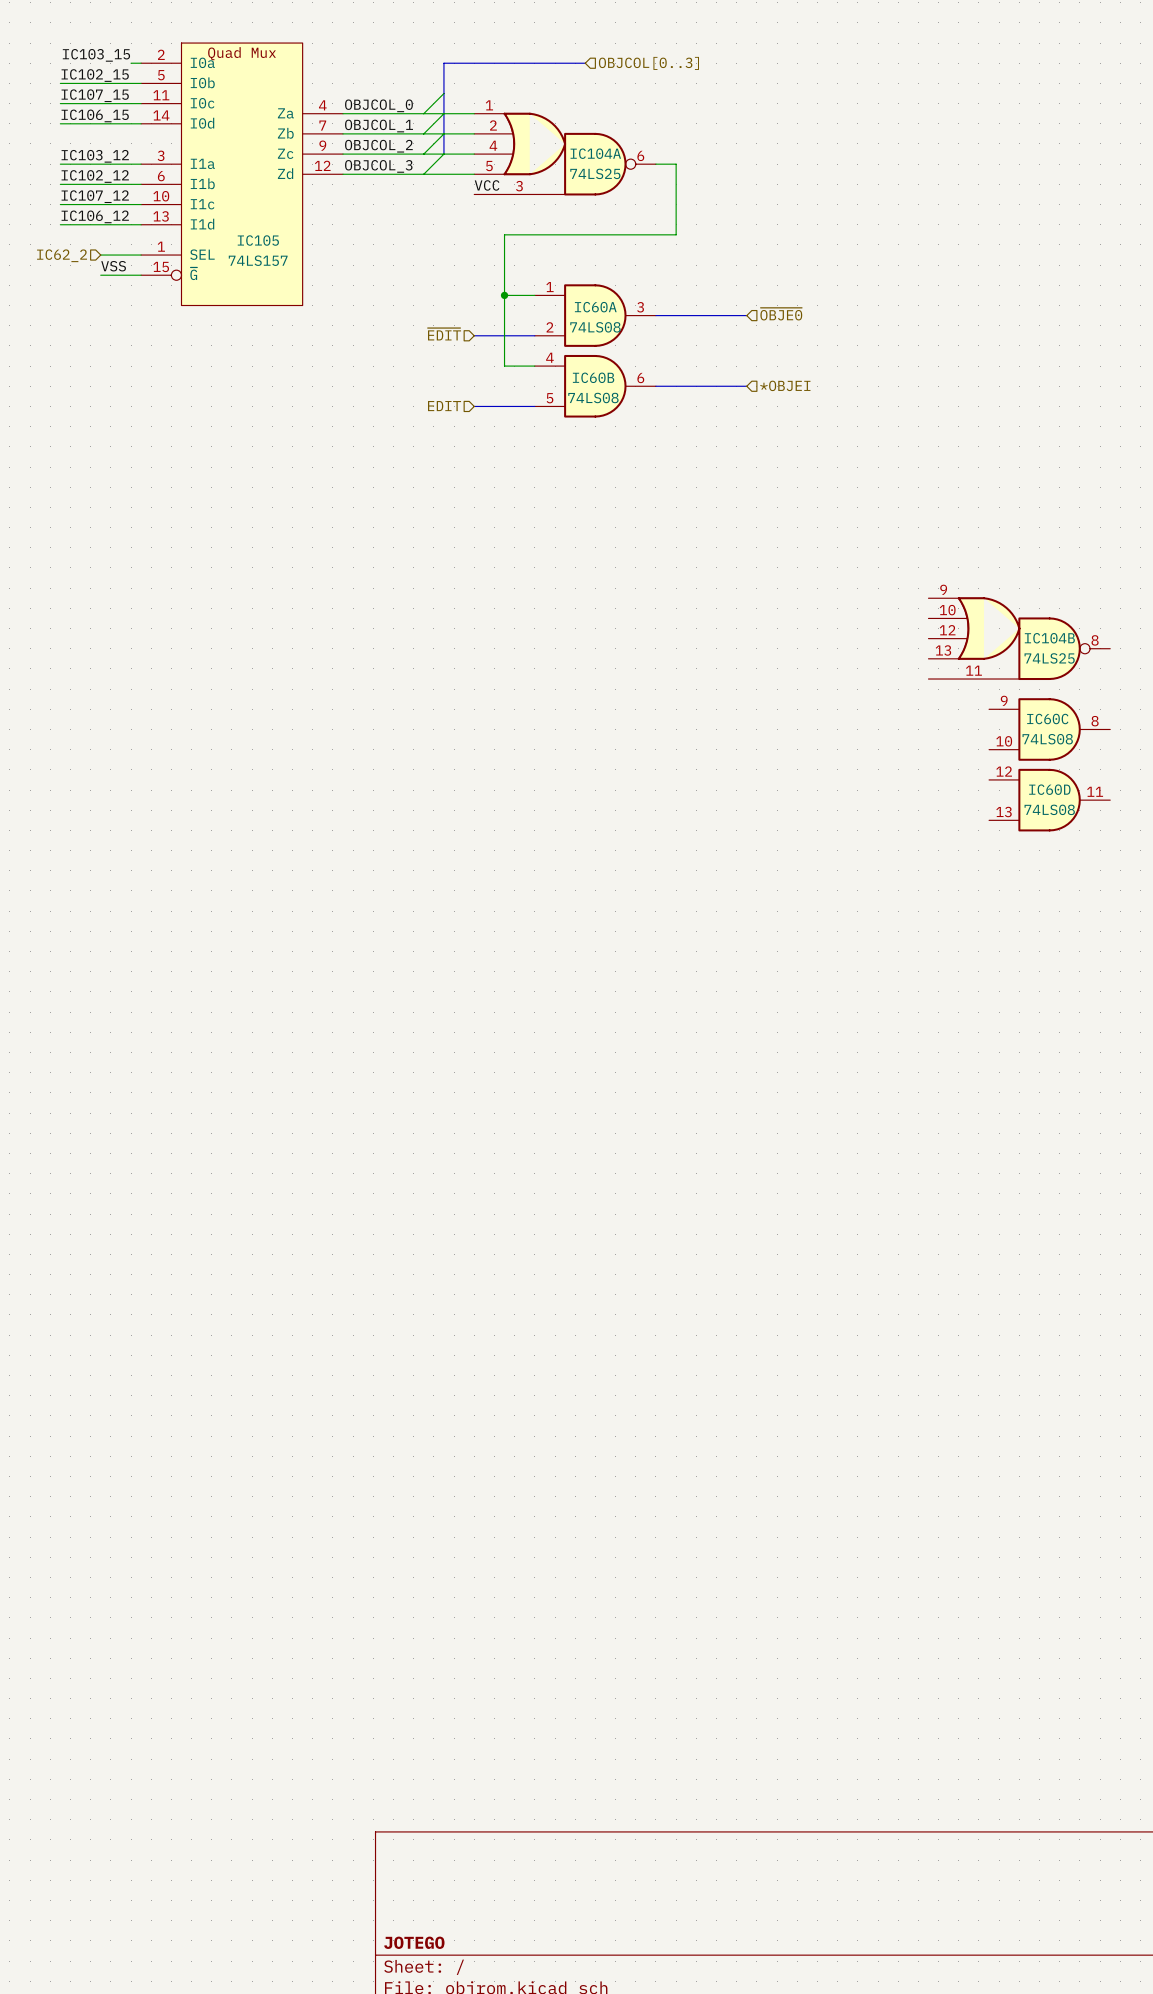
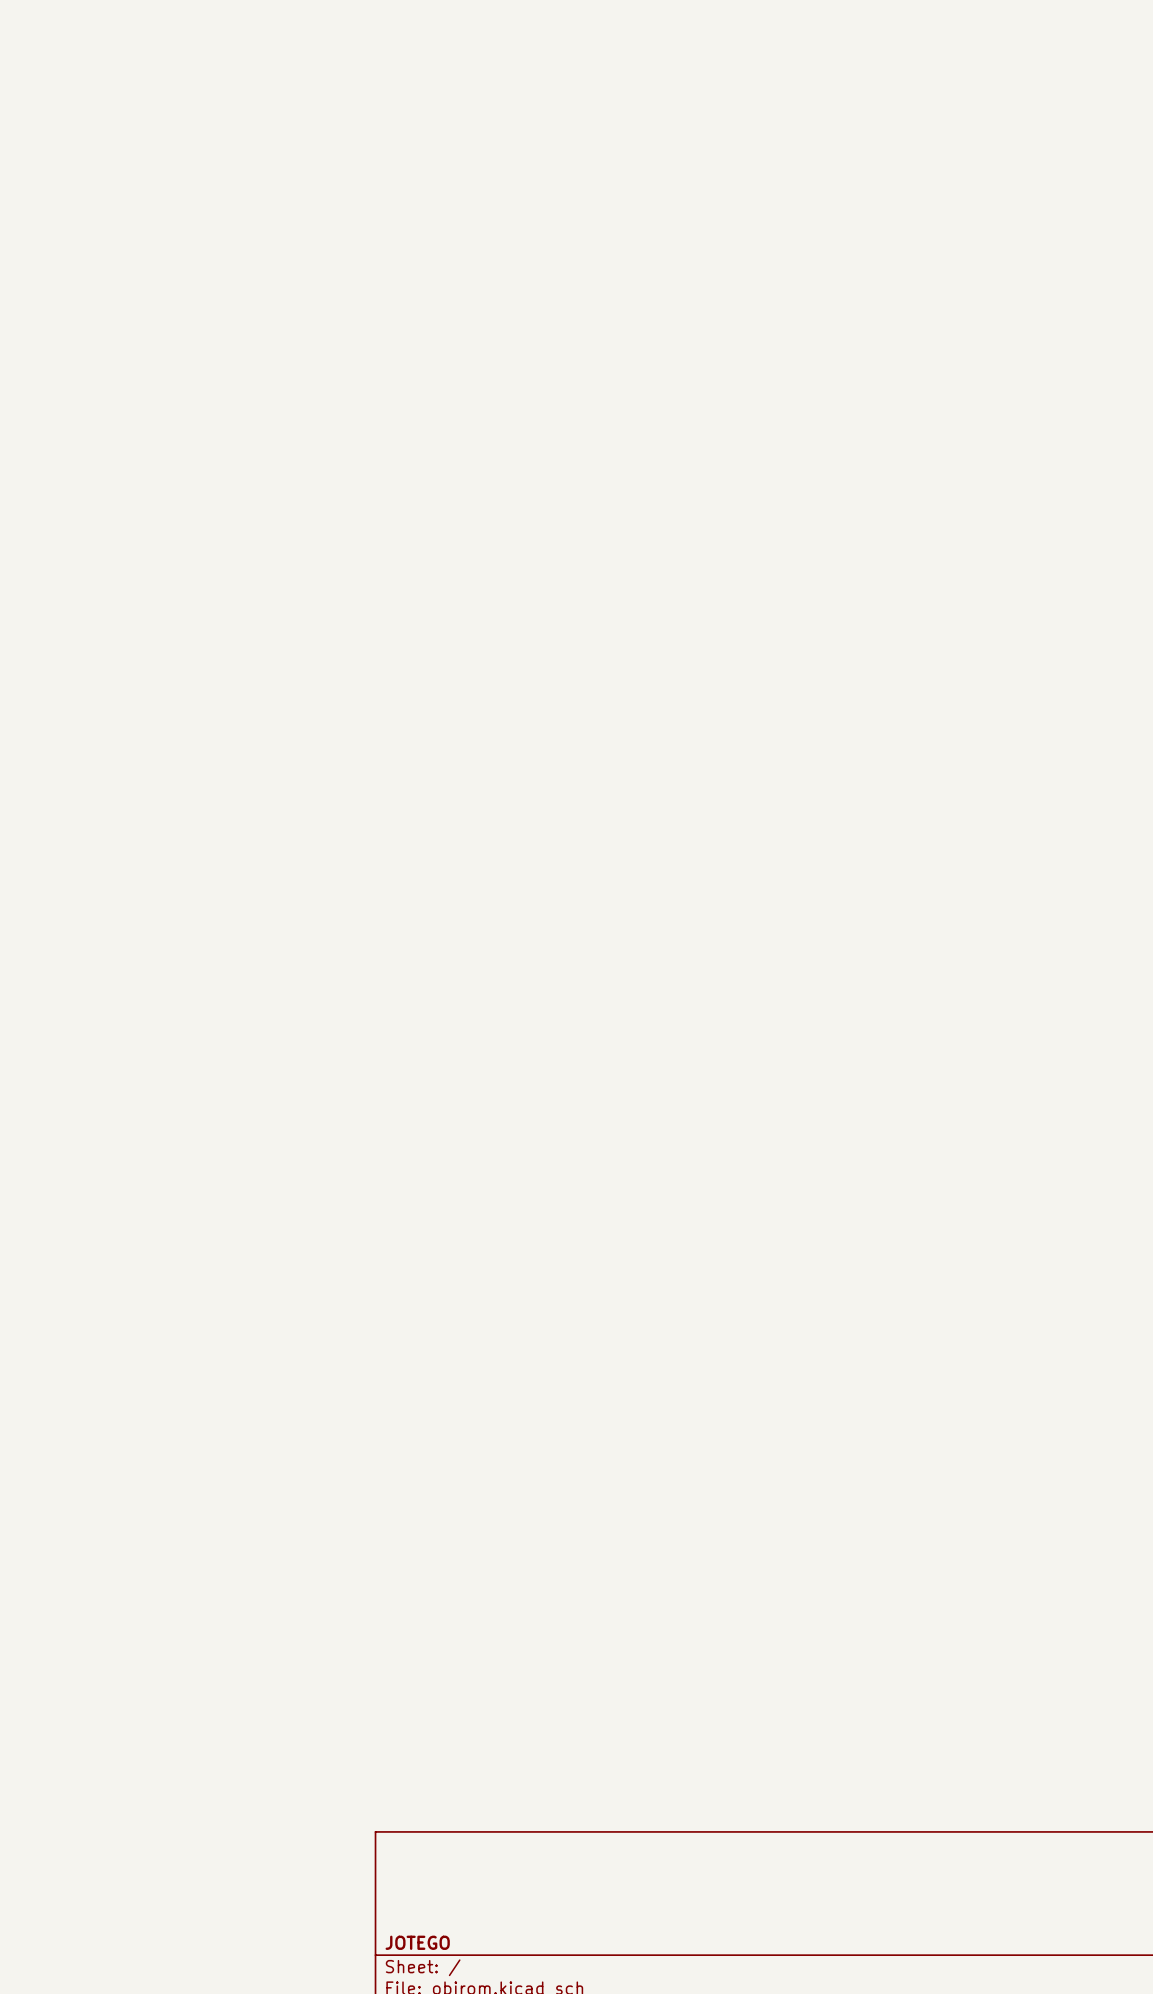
label: IC103_15 (96, 55) -> none
wire: (131, 63) (141, 63) -> none
bus: (585, 63) (443, 63) (443, 154) -> none
hierarchical label: OBJCOL[0..3] (648, 63) -> none
label: IC102_15 (95, 75) -> none
wire: (60, 83) (141, 83) -> none
wire: (443, 93) (423, 113) -> none
label: IC107_15 (95, 95) -> none
wire: (60, 103) (141, 103) -> none
label: OBJCOL_0 (378, 105) -> none
wire: (343, 113) (474, 113) -> none
wire: (443, 113) (423, 133) -> none
label: IC106_15 (95, 115) -> none
wire: (60, 123) (141, 123) -> none
label: OBJCOL_1 (379, 126) -> none
wire: (343, 133) (474, 133) -> none
wire: (443, 133) (423, 154) -> none
label: OBJCOL_2 (378, 146) -> none
wire: (343, 154) (474, 154) -> none
wire: (443, 154) (423, 174) -> none
IC104A: 74LS25 (565, 154) -> none
label: IC103_12 (95, 156) -> none
wire: (60, 164) (141, 164) -> none
wire: (655, 164) (676, 164) (676, 234) (504, 234) (504, 366) (534, 366) -> none
label: OBJCOL_3 (378, 166) -> none
IC105: 74LS157 (242, 174) -> none
wire: (343, 174) (474, 174) -> none
label: IC102_12 (95, 176) -> none
wire: (60, 184) (141, 184) -> none
label: VCC (487, 185) -> none
label: IC107_12 (95, 196) -> none
wire: (60, 204) (141, 204) -> none
label: IC106_12 (95, 216) -> none
wire: (60, 224) (141, 224) -> none
hierarchical label: IC62_2 (62, 255) -> none
wire: (100, 255) (141, 255) -> none
label: VSS (113, 266) -> none
wire: (100, 275) (141, 275) -> none
wire: (504, 295) (534, 295) -> none
junction: (504, 295) -> none
hierarchical label: ~{OBJE0} (781, 314) -> none
IC60A: 74LS08 (595, 315) -> none
bus: (655, 315) (746, 315) -> none
hierarchical label: ~{EDIT} (444, 334) -> none
bus: (474, 335) (534, 335) -> none
hierarchical label: *OBJEI (785, 385) -> none
IC60B: 74LS08 (595, 386) -> none
bus: (655, 386) (746, 386) -> none
hierarchical label: EDIT (444, 406) -> none
bus: (474, 406) (534, 406) -> none
IC104B: 74LS25 (1019, 638) -> none
IC60C: 74LS08 (1049, 729) -> none
IC60D: 74LS08 (1049, 800) -> none

